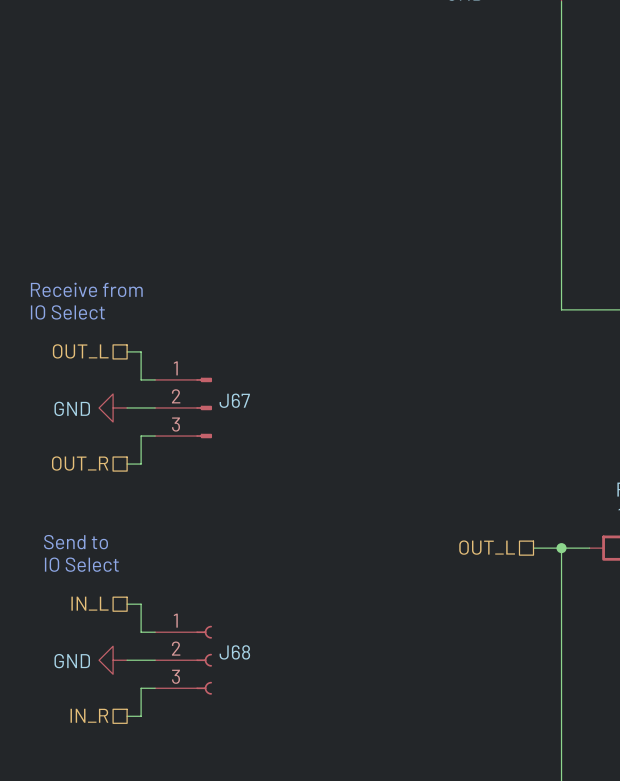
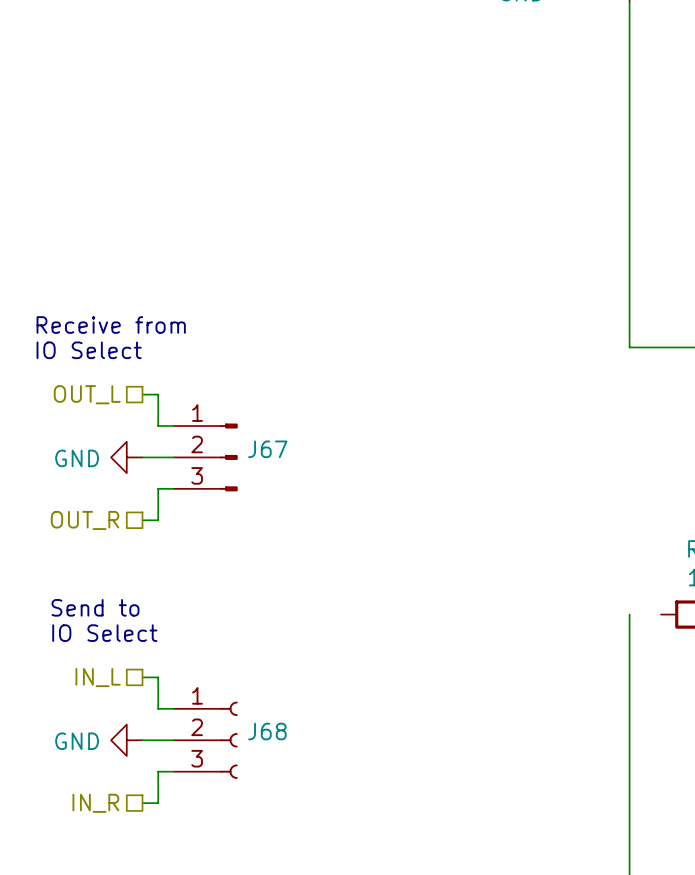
hierarchical label: OUT_L (487, 547) -> none
wire: (533, 548) (589, 548) -> none
junction: (561, 548) -> none

